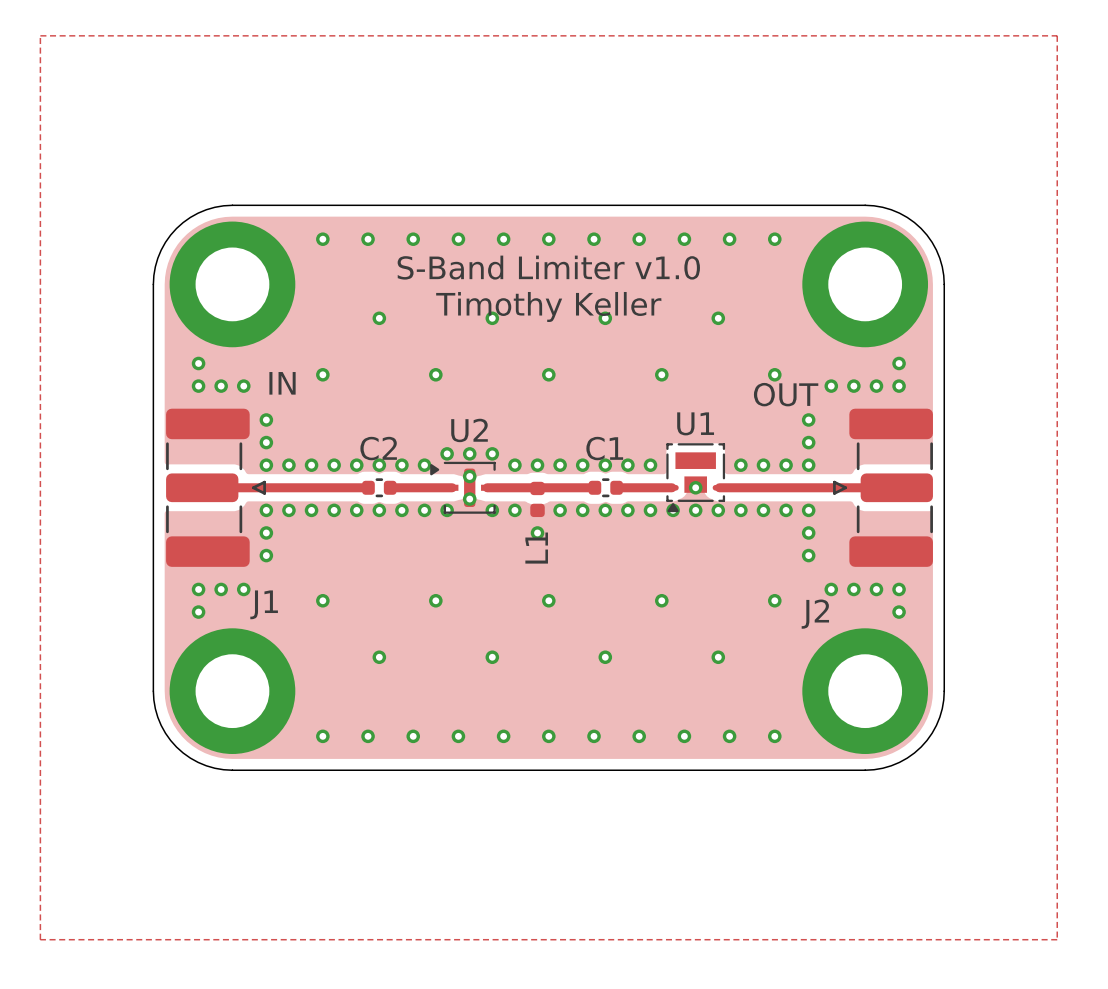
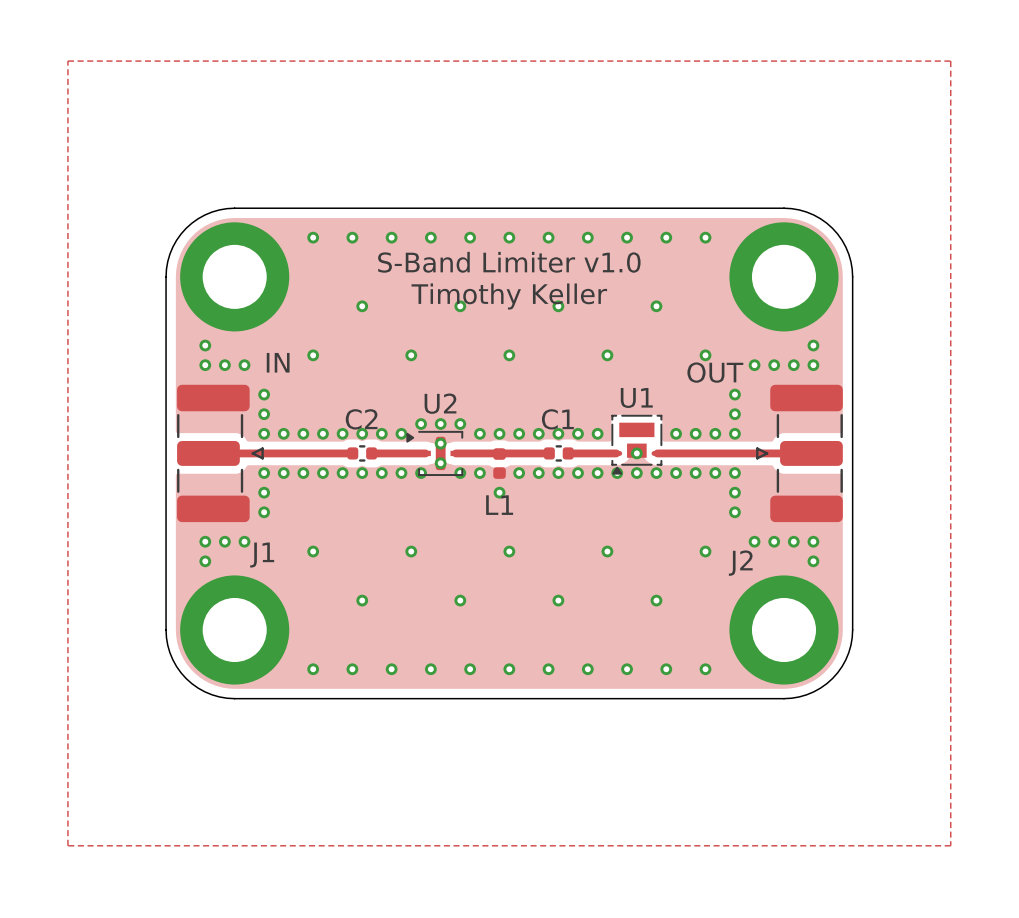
L1 name rotation: 0° (536, 548) -> 90° clockwise (499, 505)

